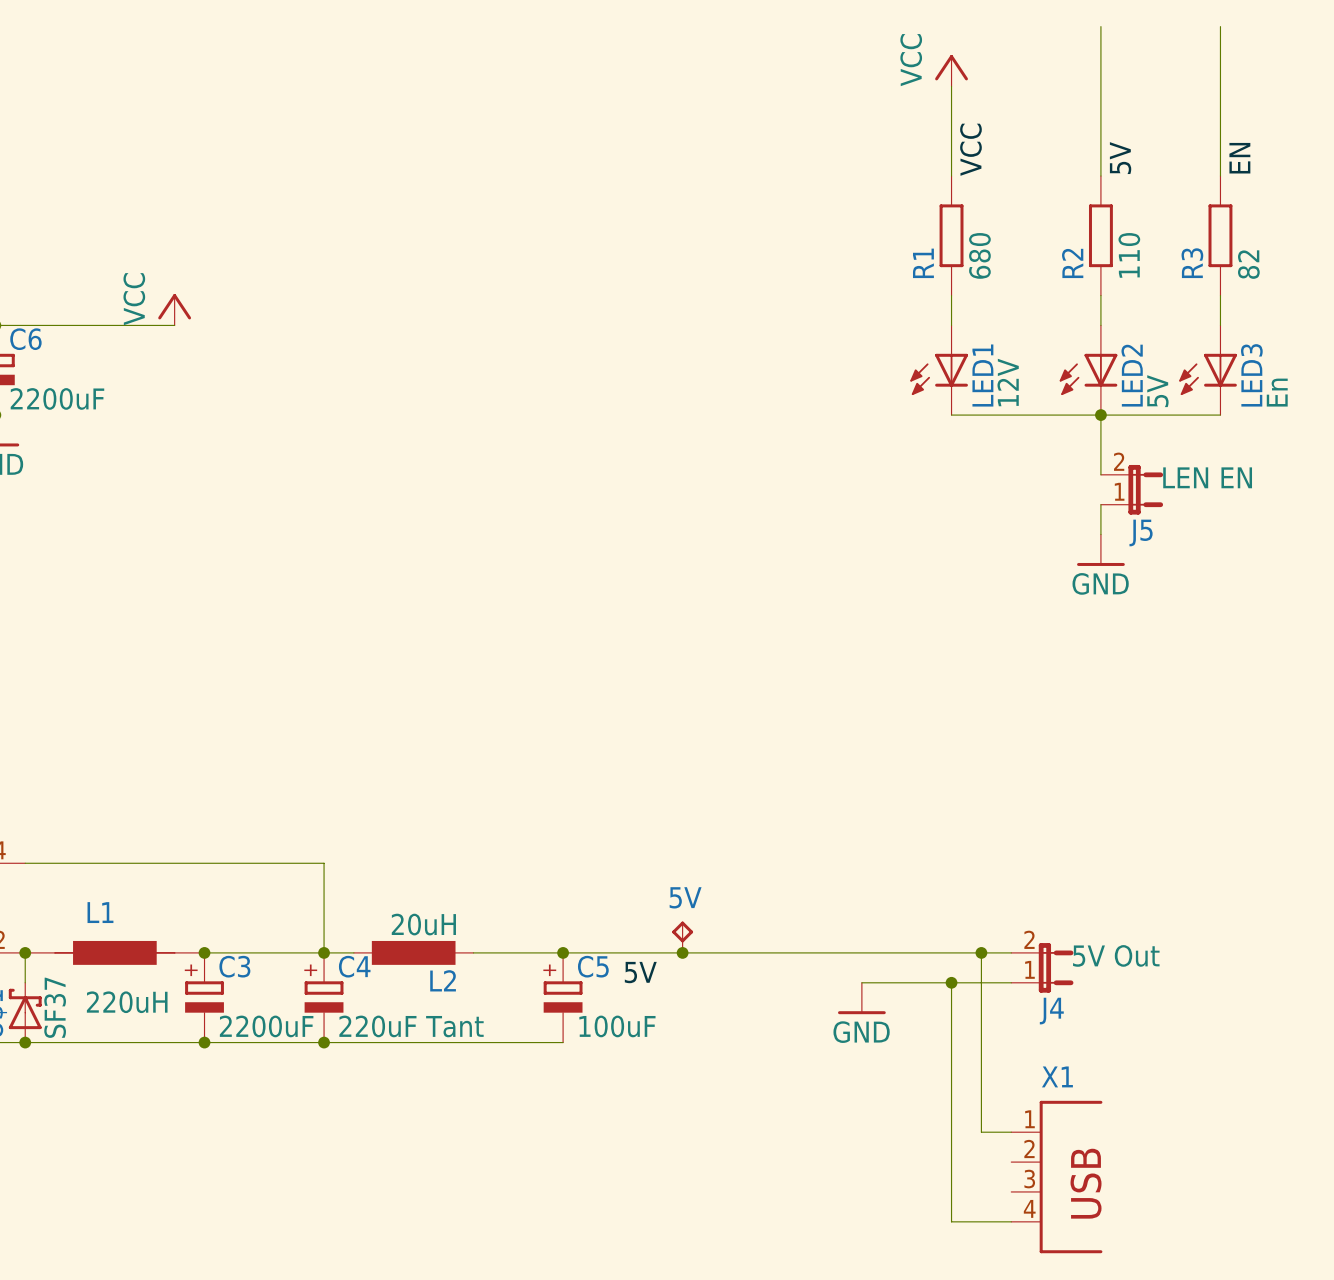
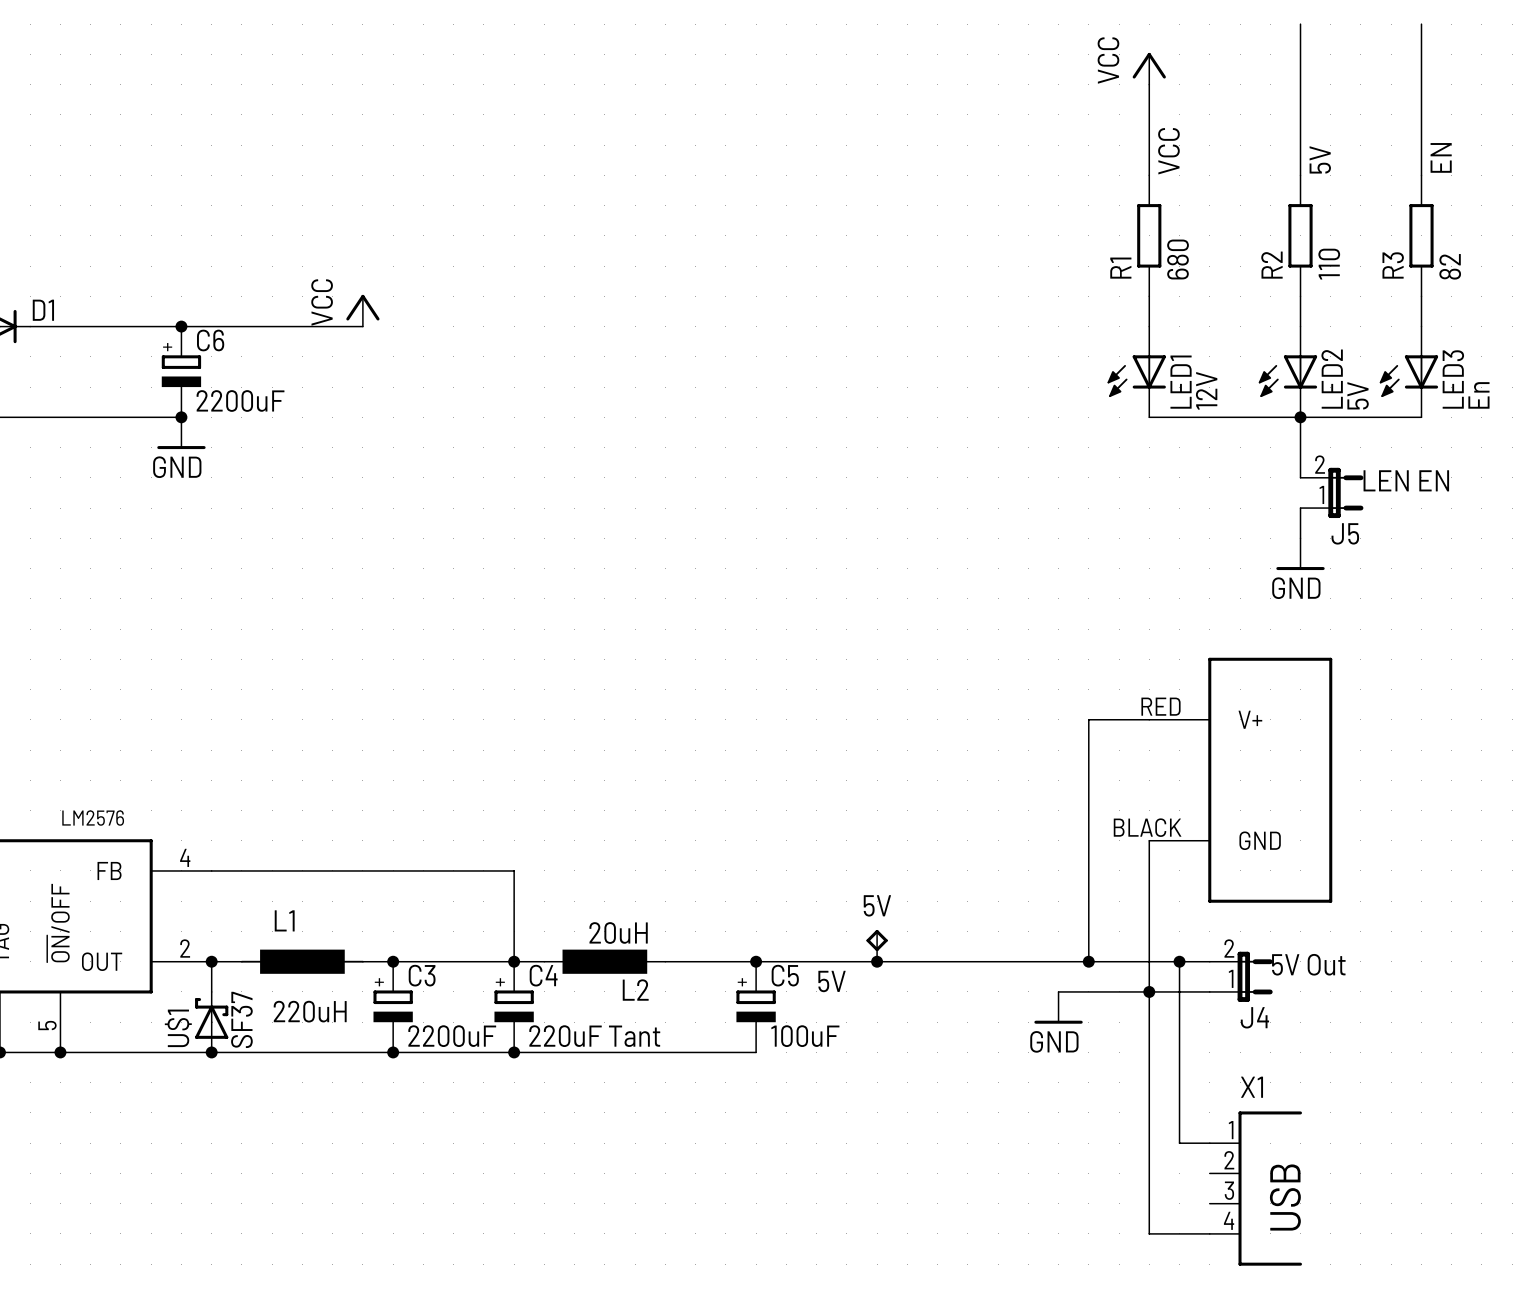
wire: none -> (1149, 719) (1088, 719) (1088, 961)
part: none -> (1240, 780)
wire: none -> (1149, 840) (1149, 991)
junction: none -> (1088, 961)

